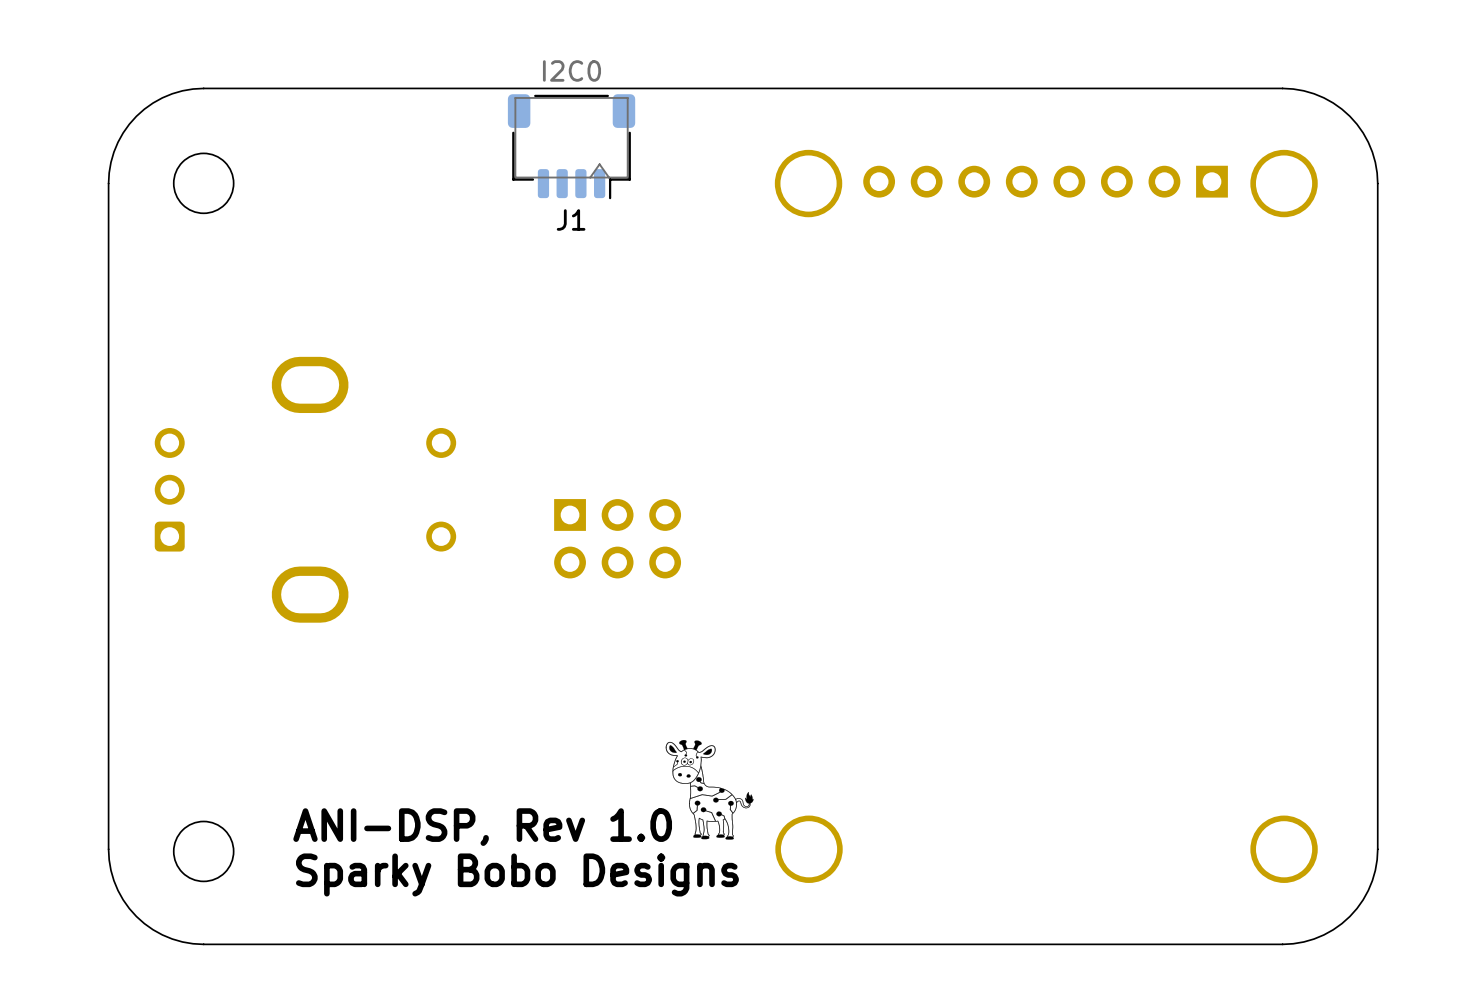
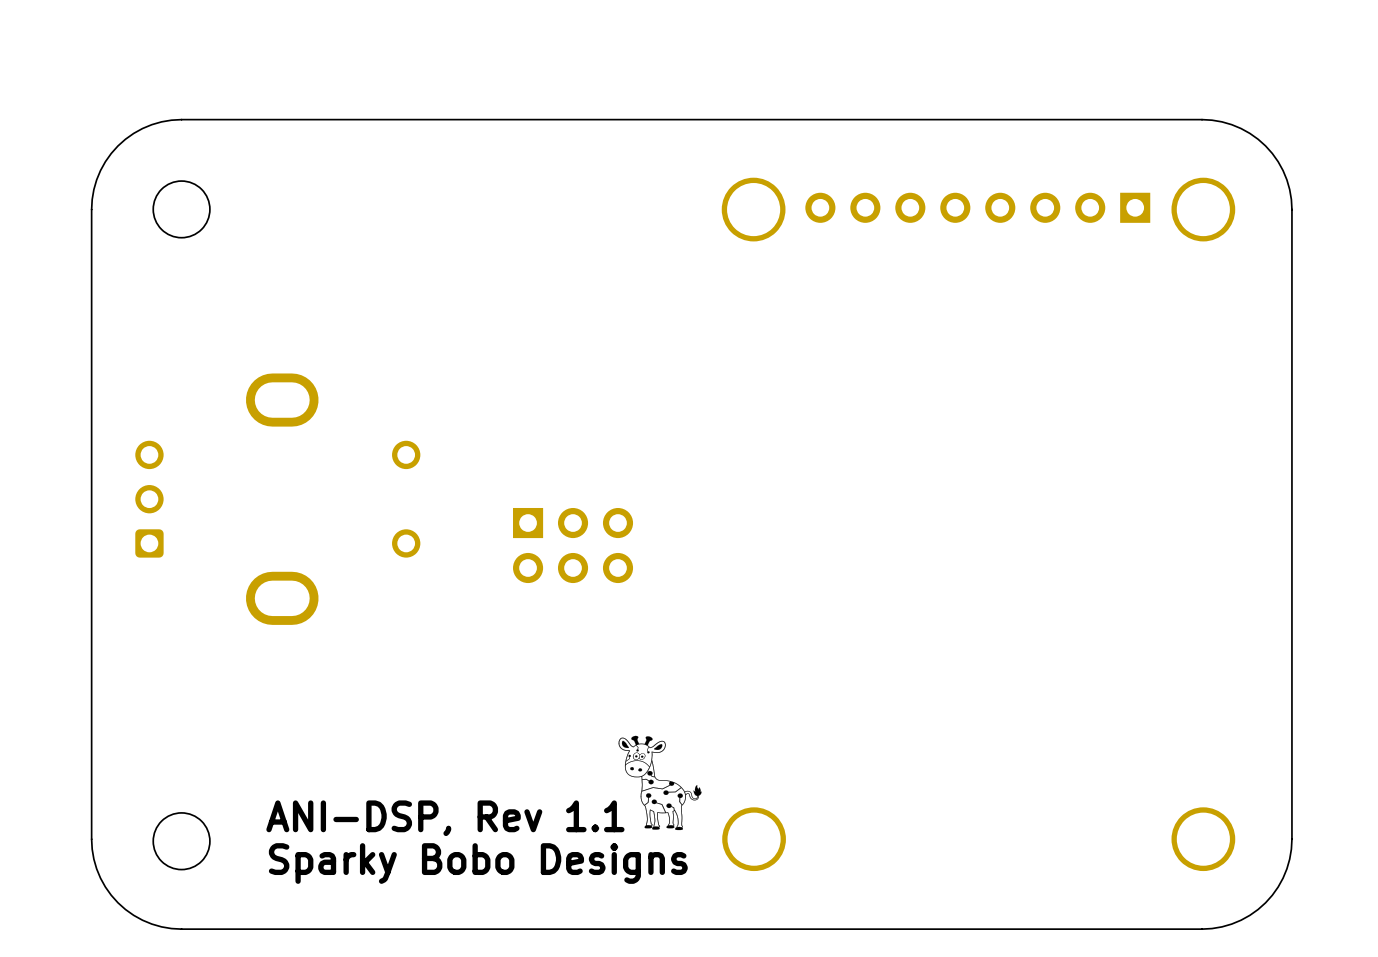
J1: I2C0 (571, 146) -> none
text: ANI-DSP, Rev 1.0 (482, 827) -> ANI-DSP, Rev 1.1 (445, 818)

